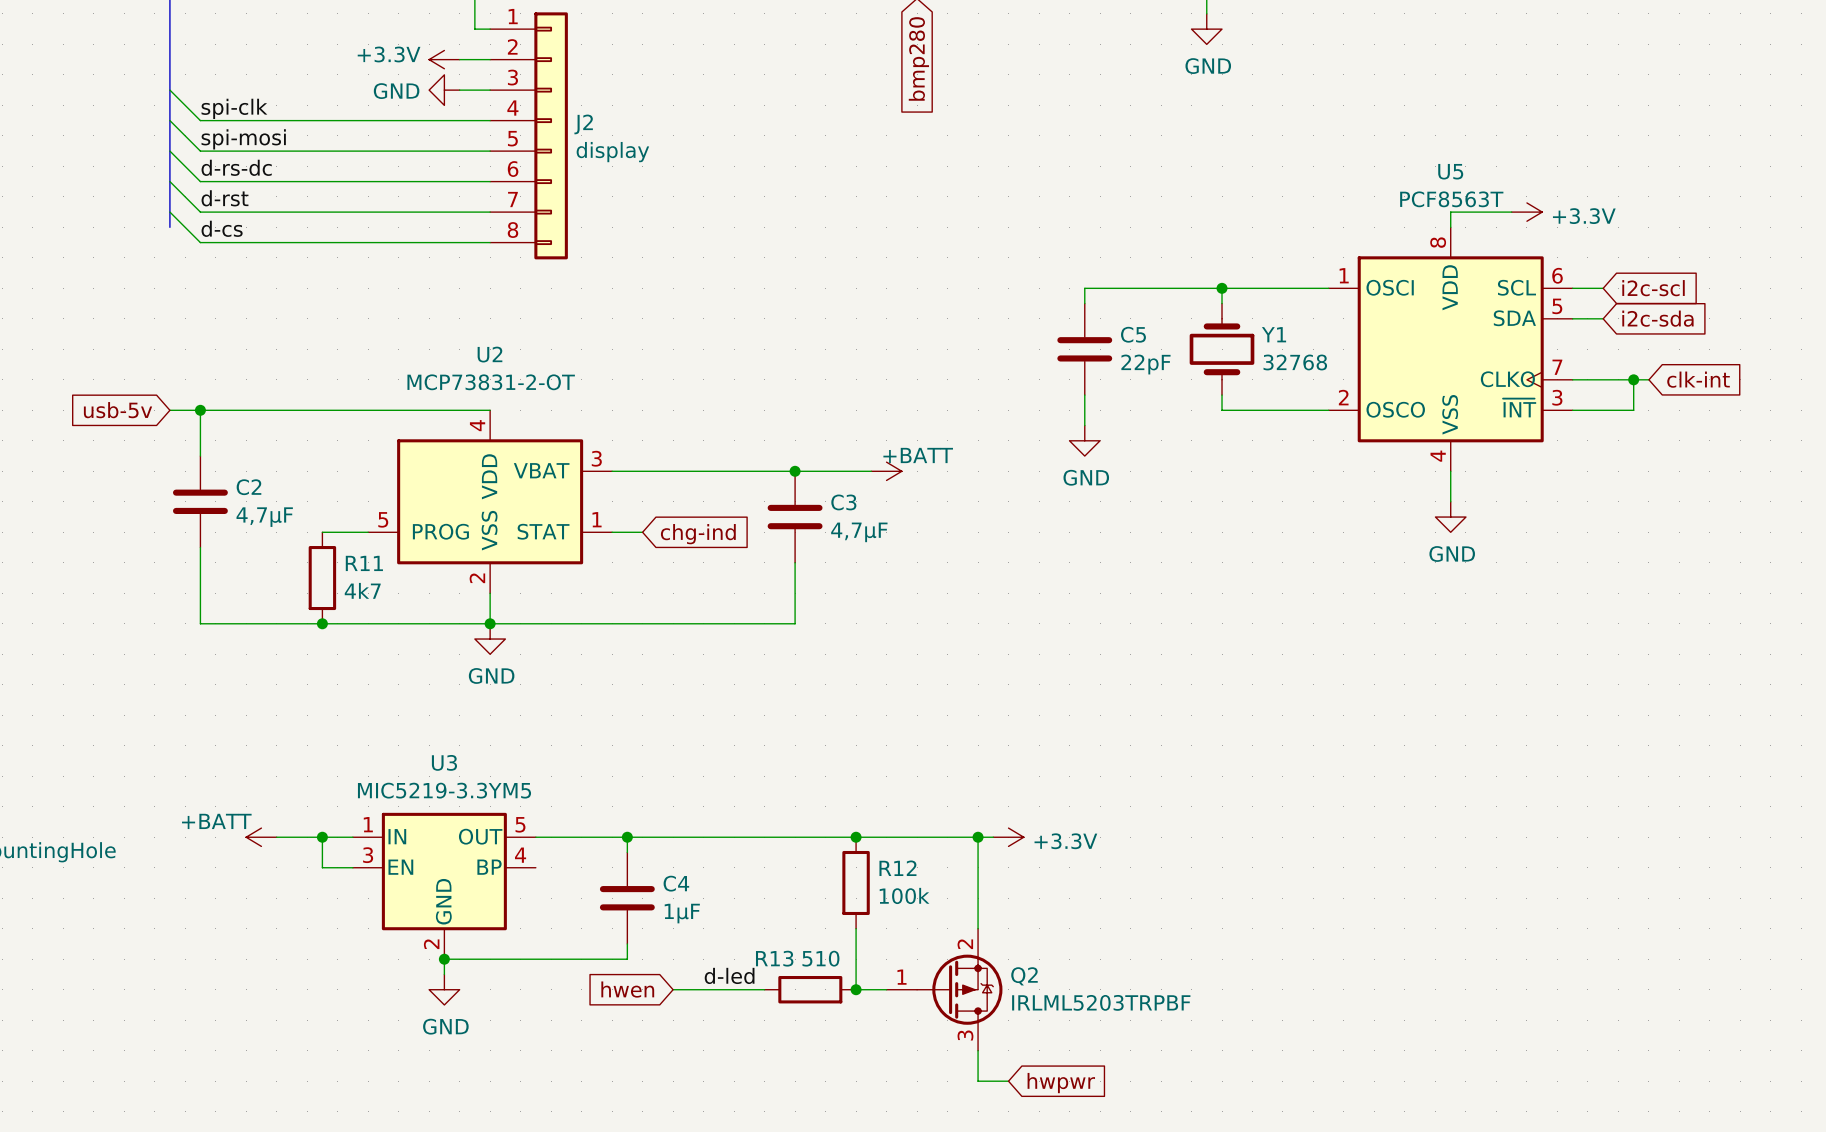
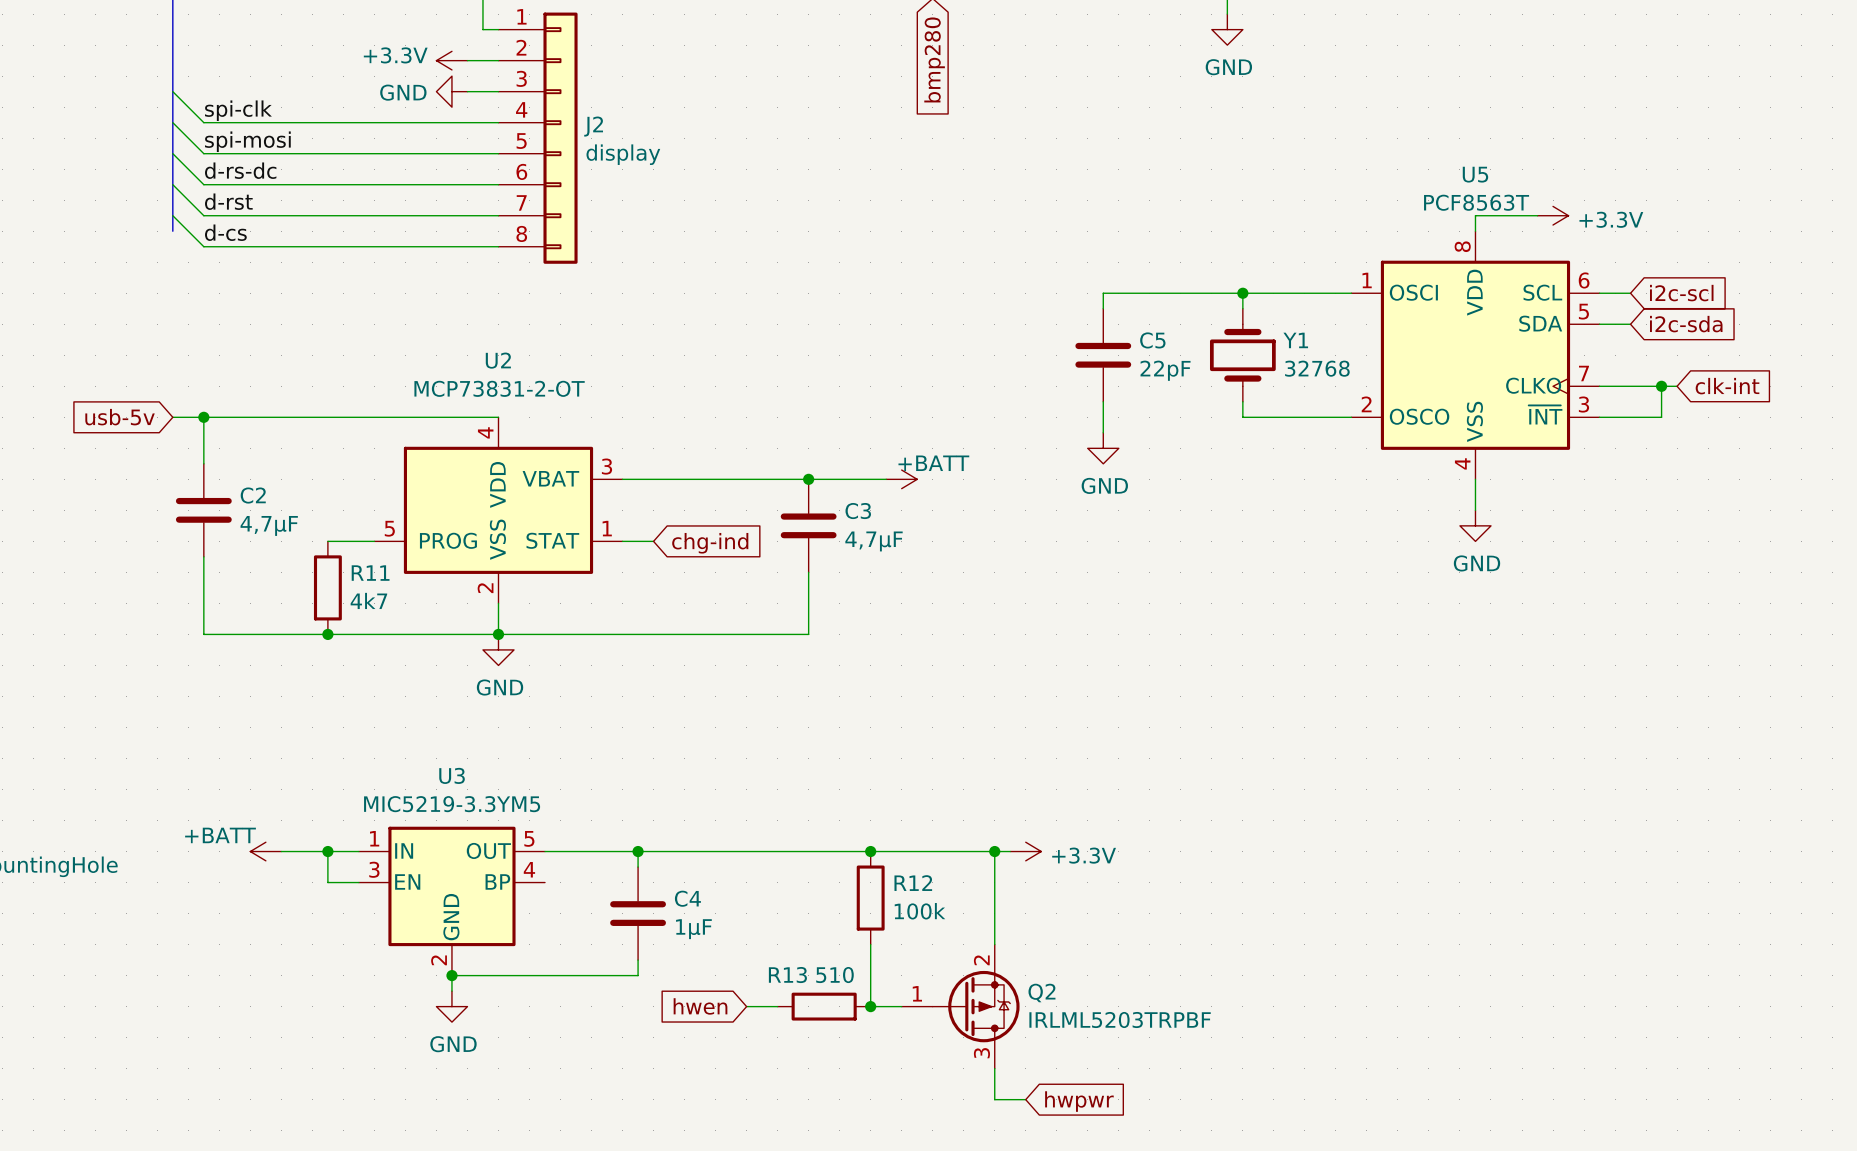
label: d-led (729, 975) -> none
global label position: hwen (627, 989) -> hwen (700, 1006)
wire: (673, 989) (734, 989) -> none

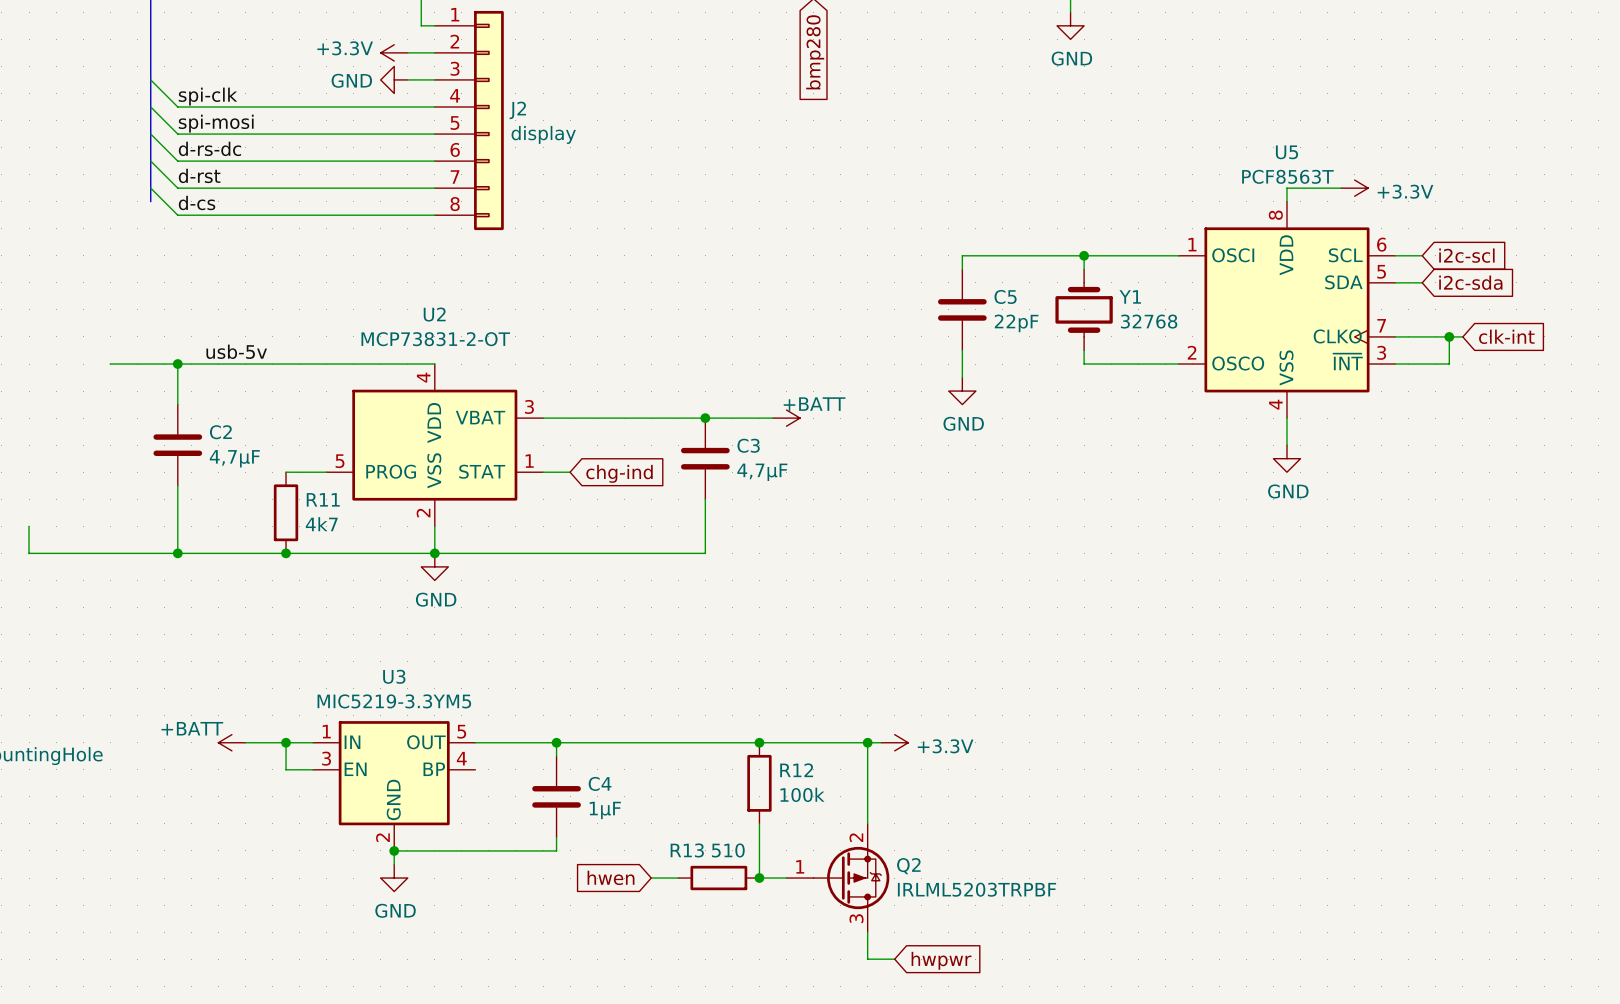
label: none -> usb-5v (236, 351)
global label: usb-5v (120, 417) -> none
wire: none -> (110, 364) (150, 364)
wire: none -> (29, 526) (29, 553) (177, 553)
junction: none -> (177, 553)

